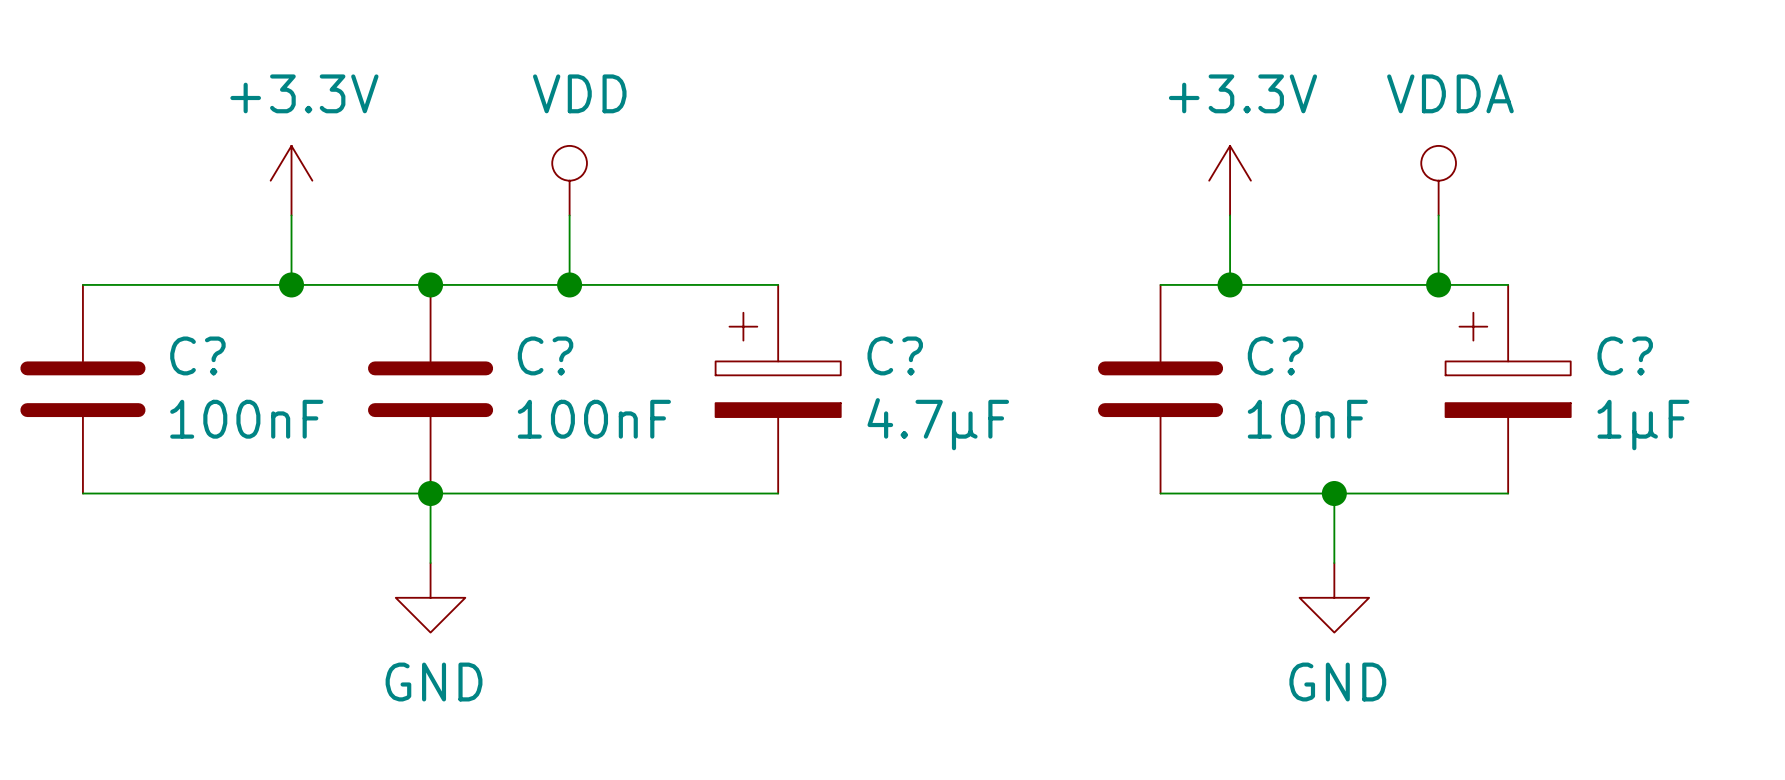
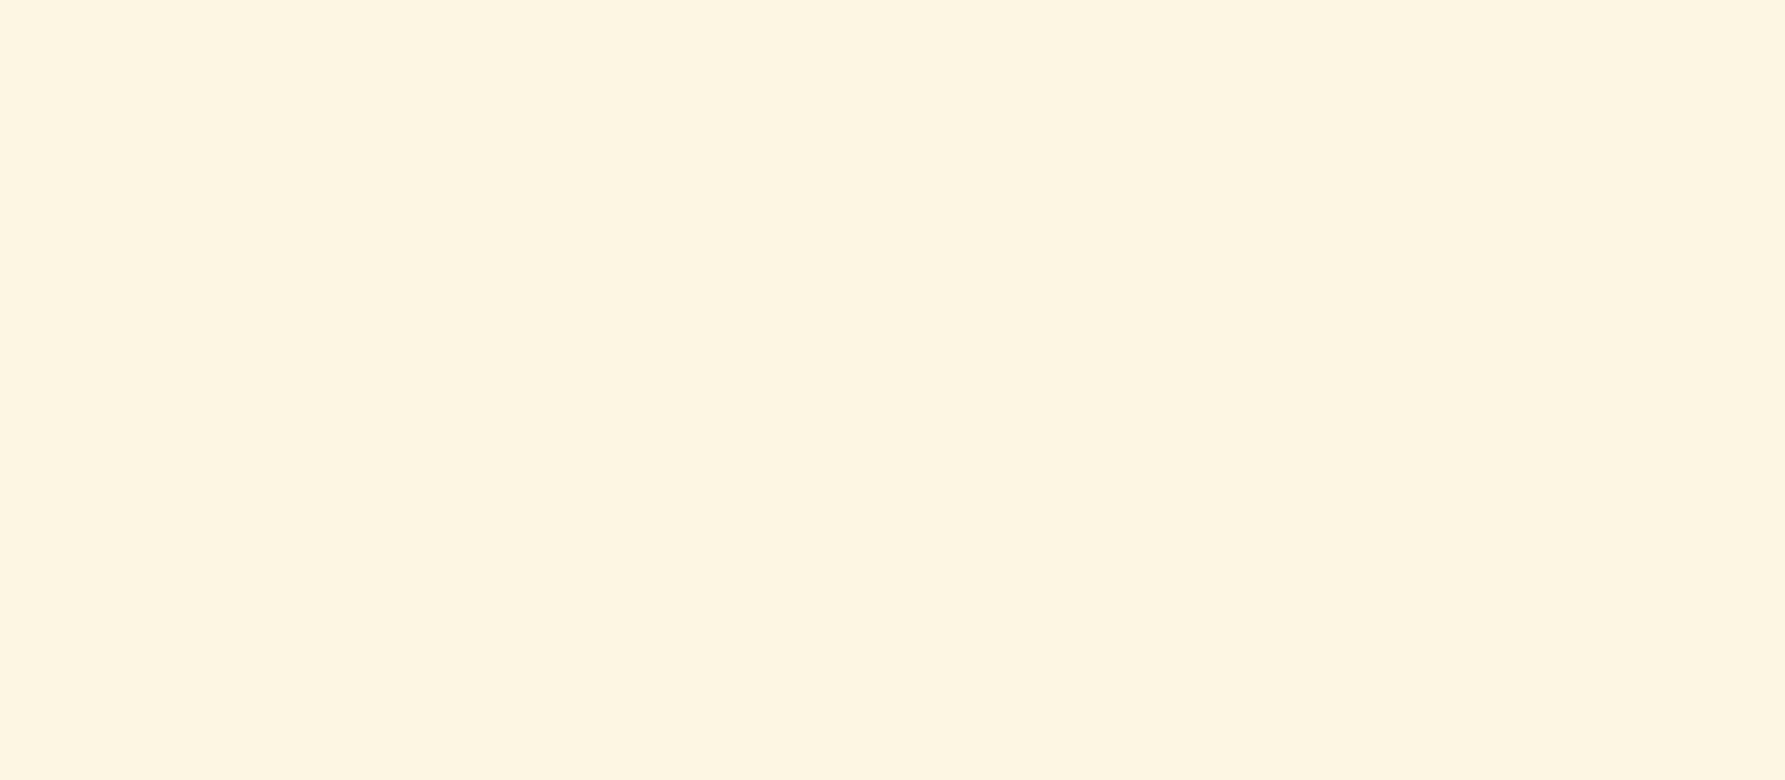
power symbol: +3.3V (291, 180) -> none
power symbol: VDD (569, 180) -> none
power symbol: +3.3V (1230, 180) -> none
power symbol: VDDA (1438, 180) -> none
wire: (291, 215) (291, 284) -> none
wire: (569, 215) (569, 284) -> none
wire: (1230, 215) (1230, 284) -> none
wire: (1438, 215) (1438, 284) -> none
wire: (82, 284) (778, 284) -> none
junction: (291, 284) -> none
junction: (430, 284) -> none
junction: (569, 284) -> none
wire: (1160, 284) (1508, 284) -> none
junction: (1230, 284) -> none
junction: (1438, 284) -> none
C?: 100nF (82, 389) -> none
C?: 100nF (430, 389) -> none
C?: 4.7μF (778, 389) -> none
C?: 10nF (1160, 389) -> none
C?: 1μF (1508, 389) -> none
wire: (82, 493) (778, 493) -> none
wire: (430, 493) (430, 563) -> none
junction: (430, 493) -> none
wire: (1160, 493) (1508, 493) -> none
wire: (1334, 493) (1334, 563) -> none
junction: (1334, 493) -> none
power symbol: GND (430, 597) -> none
power symbol: GND (1334, 597) -> none

